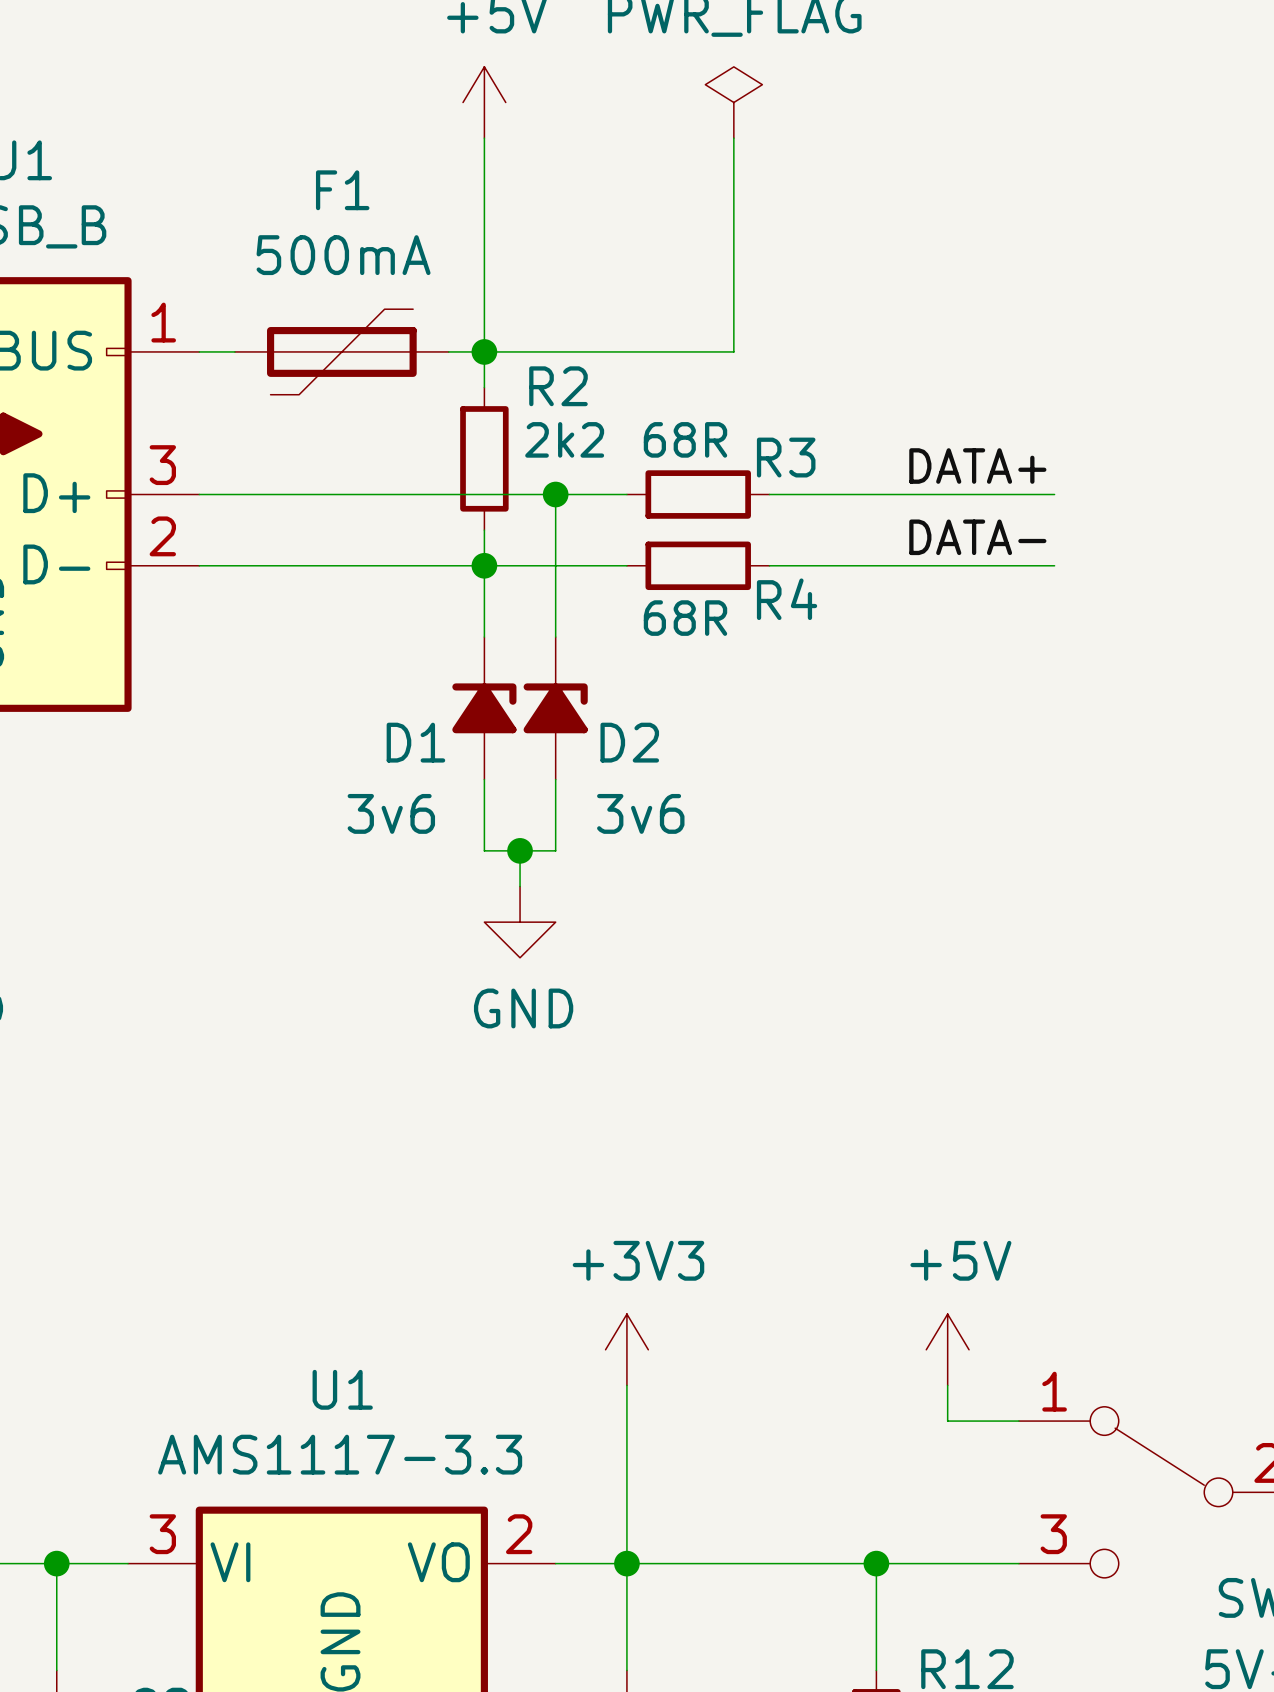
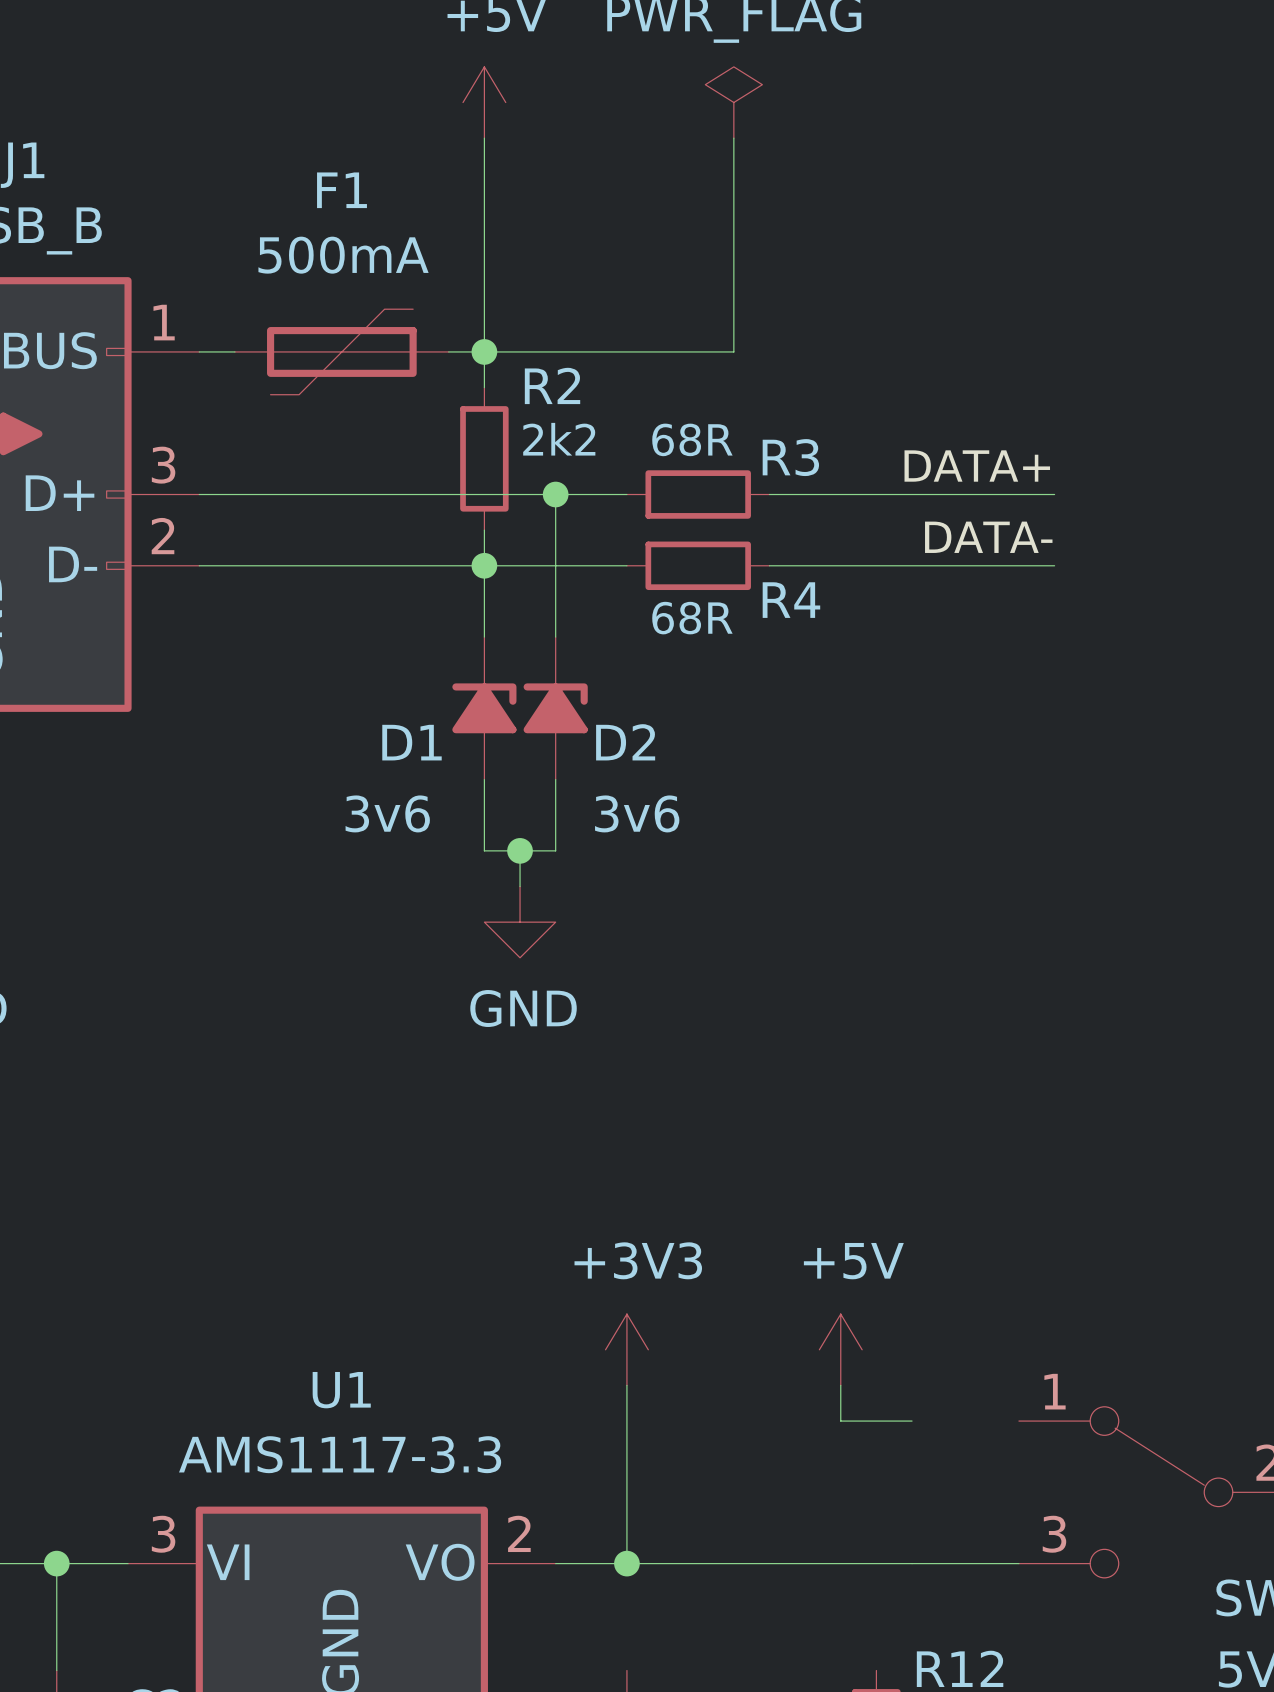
power symbol position: +5V (947, 1349) -> +5V (840, 1349)
wire: (947, 1385) (947, 1421) (1018, 1421) -> (840, 1385) (840, 1421) (912, 1421)
wire: (626, 1563) (626, 1670) -> none
wire: (876, 1563) (876, 1670) -> none
junction: (876, 1563) -> none

